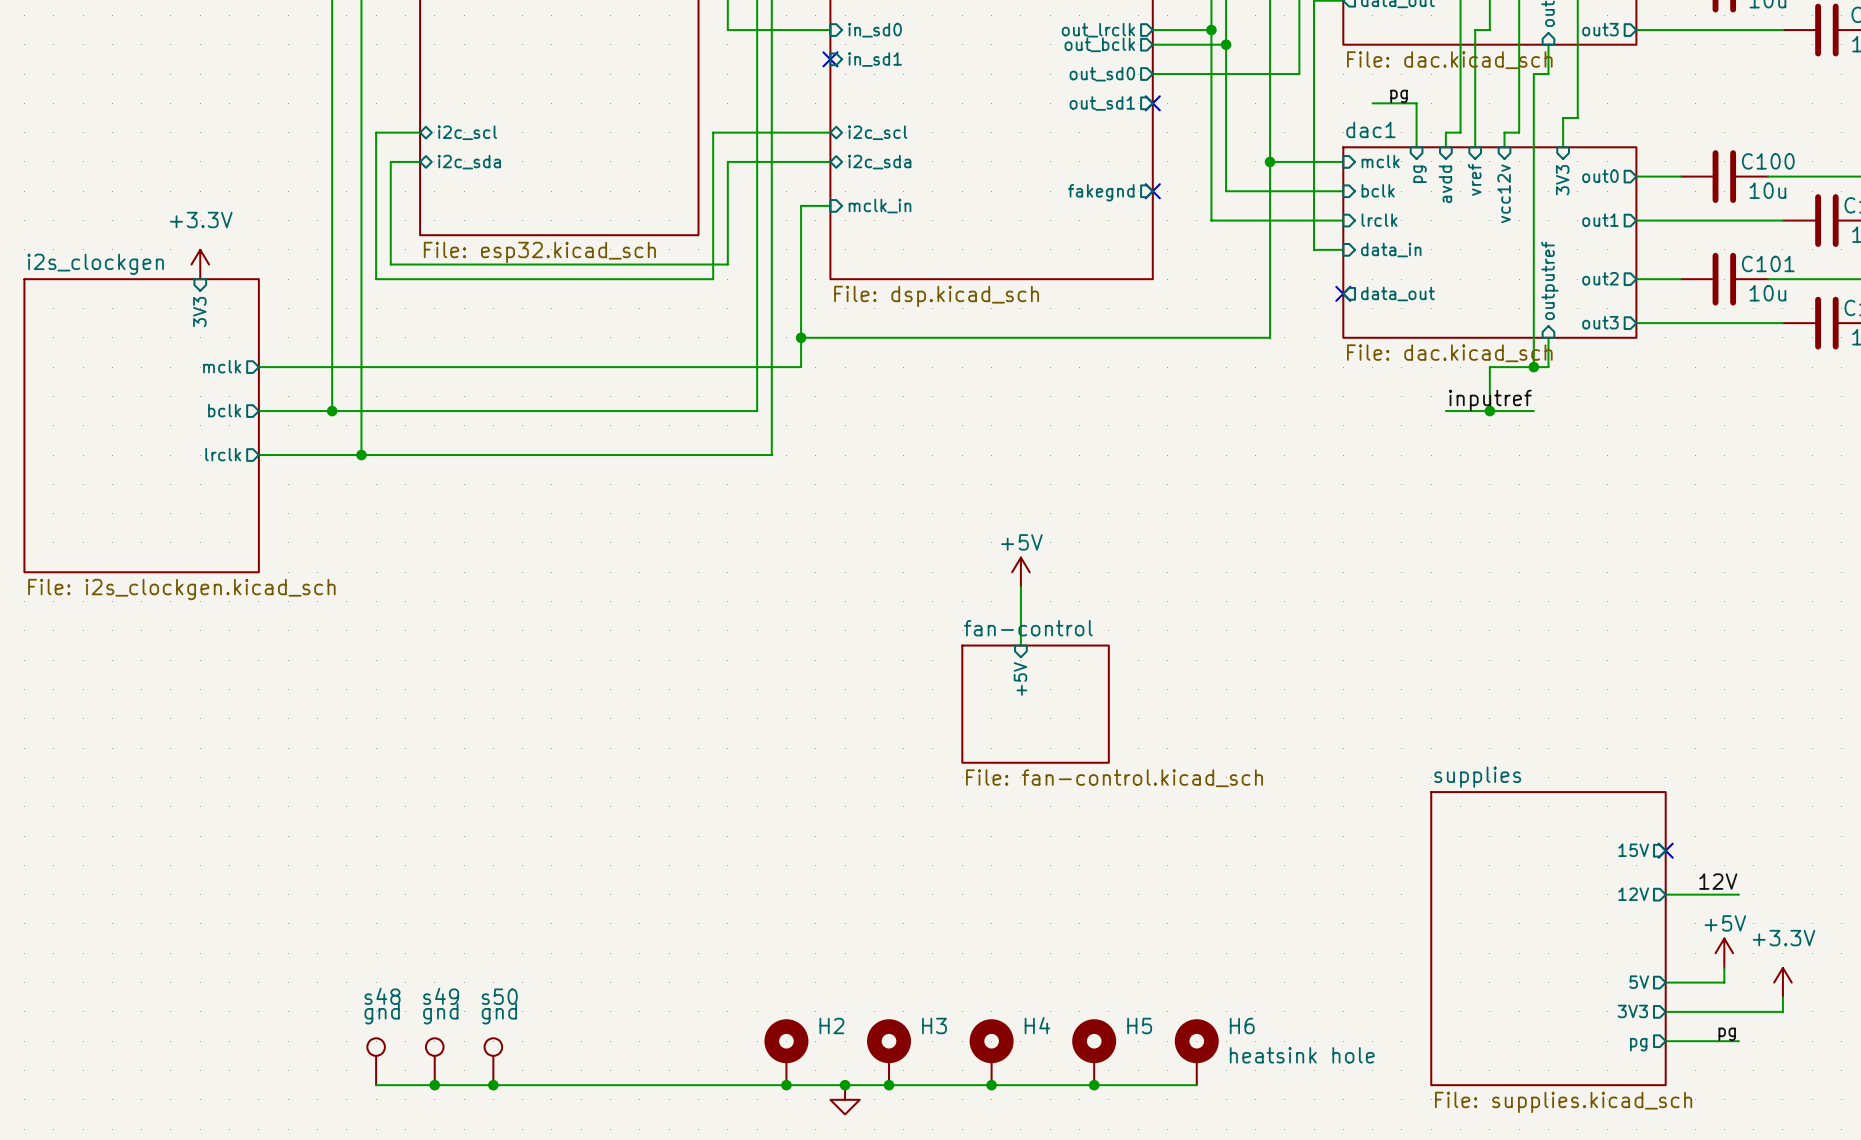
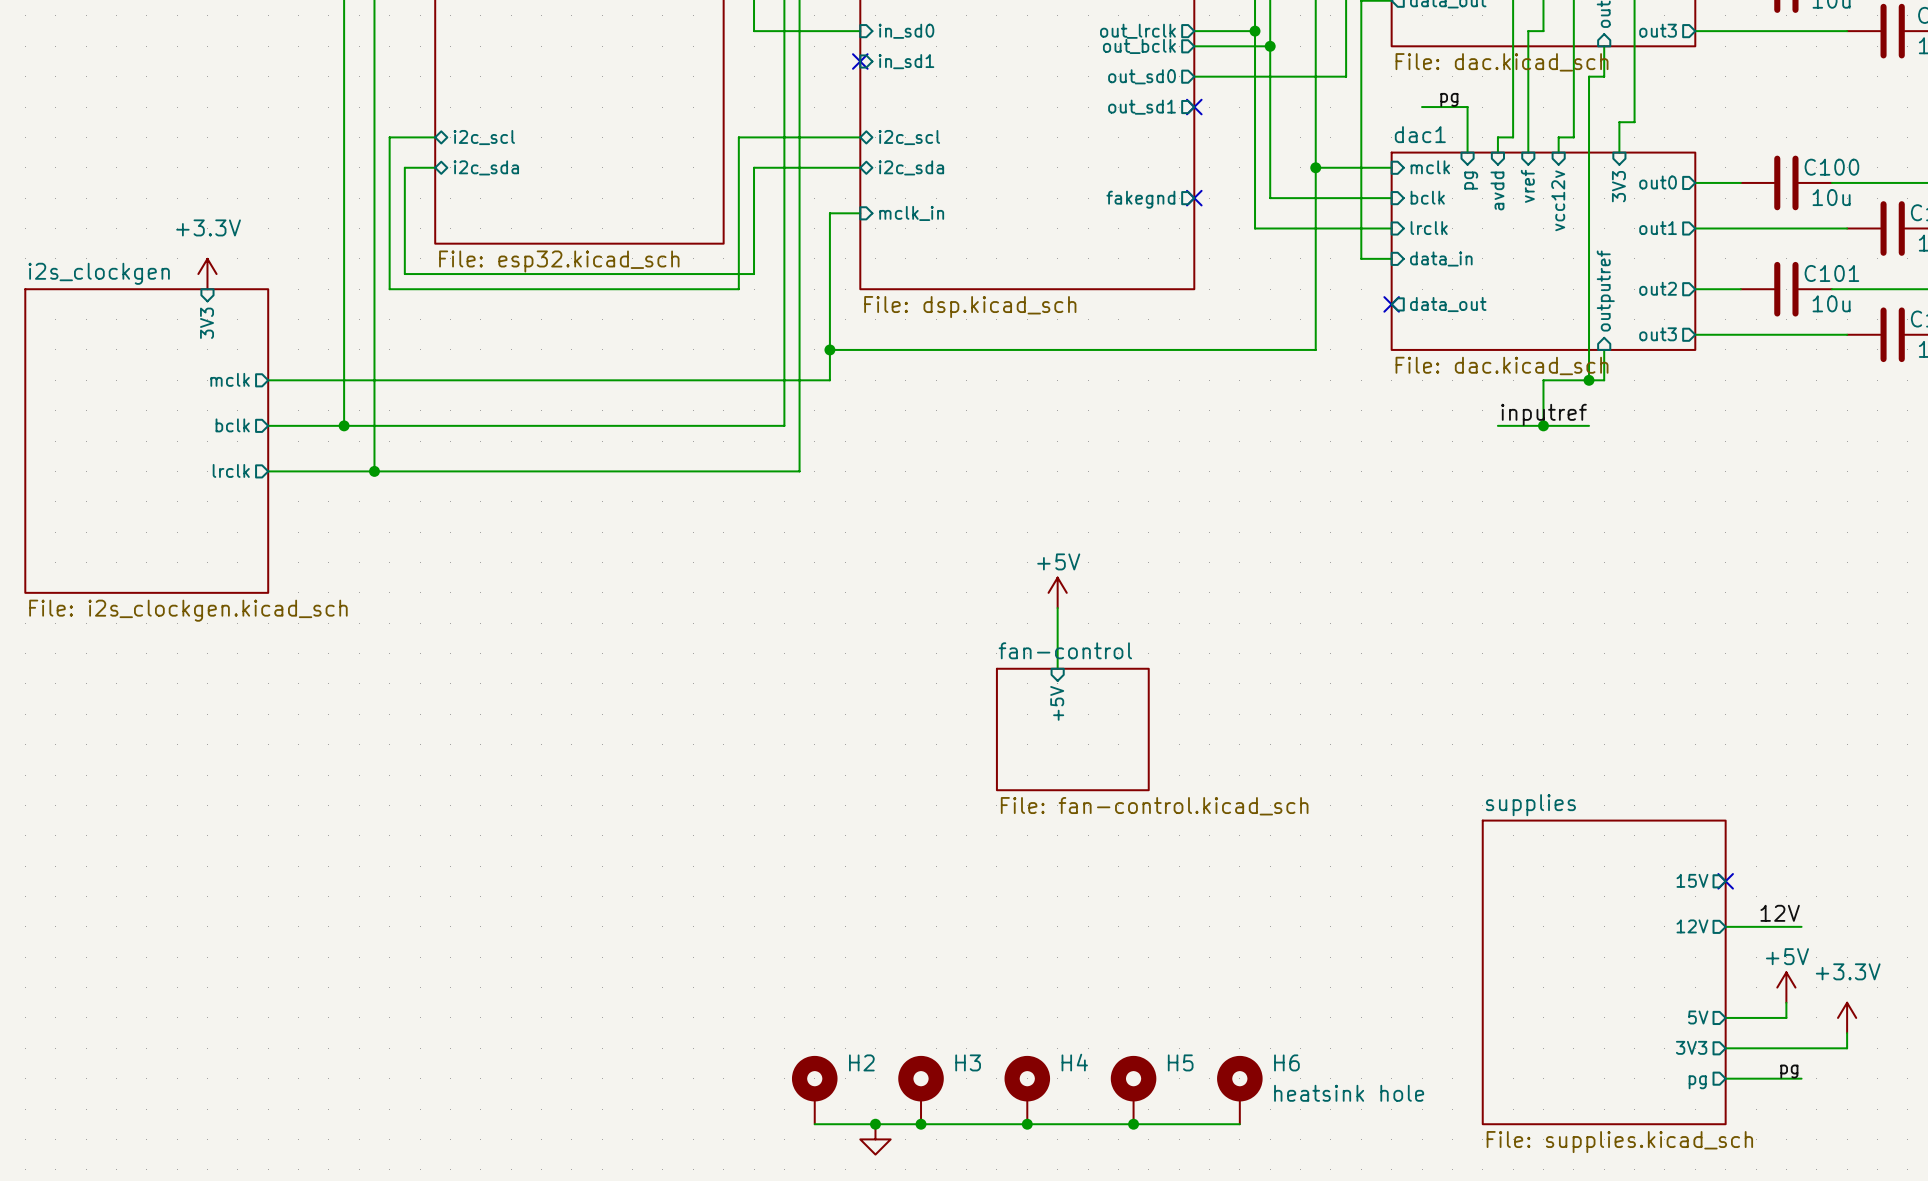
s48: gnd (376, 1061) -> none
s49: gnd (434, 1061) -> none
s50: gnd (493, 1061) -> none
wire: (376, 1085) (786, 1085) -> none
junction: (434, 1085) -> none
junction: (493, 1085) -> none
junction: (786, 1085) -> none

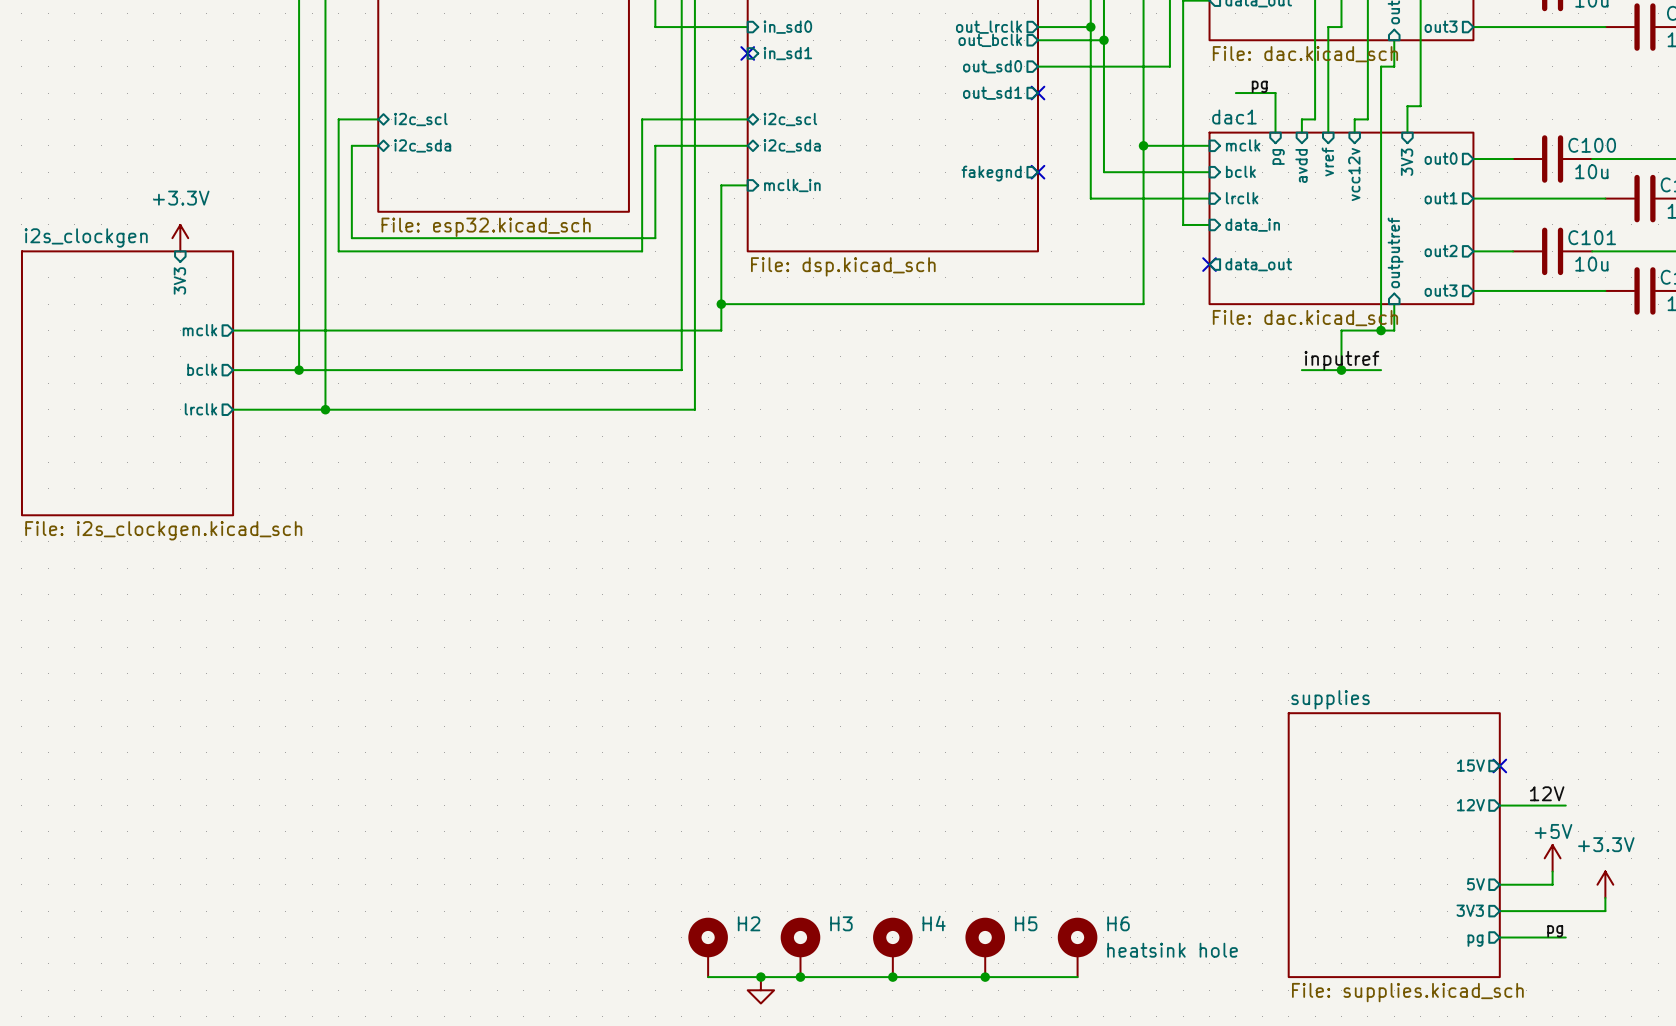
power symbol: +5V (1057, 592) -> none
wire: (1057, 608) (1057, 668) -> none
sheet pin: +5V (1057, 703) -> none
sheet fan-control: File: fan-control.kicad_sch (1072, 729) -> none

